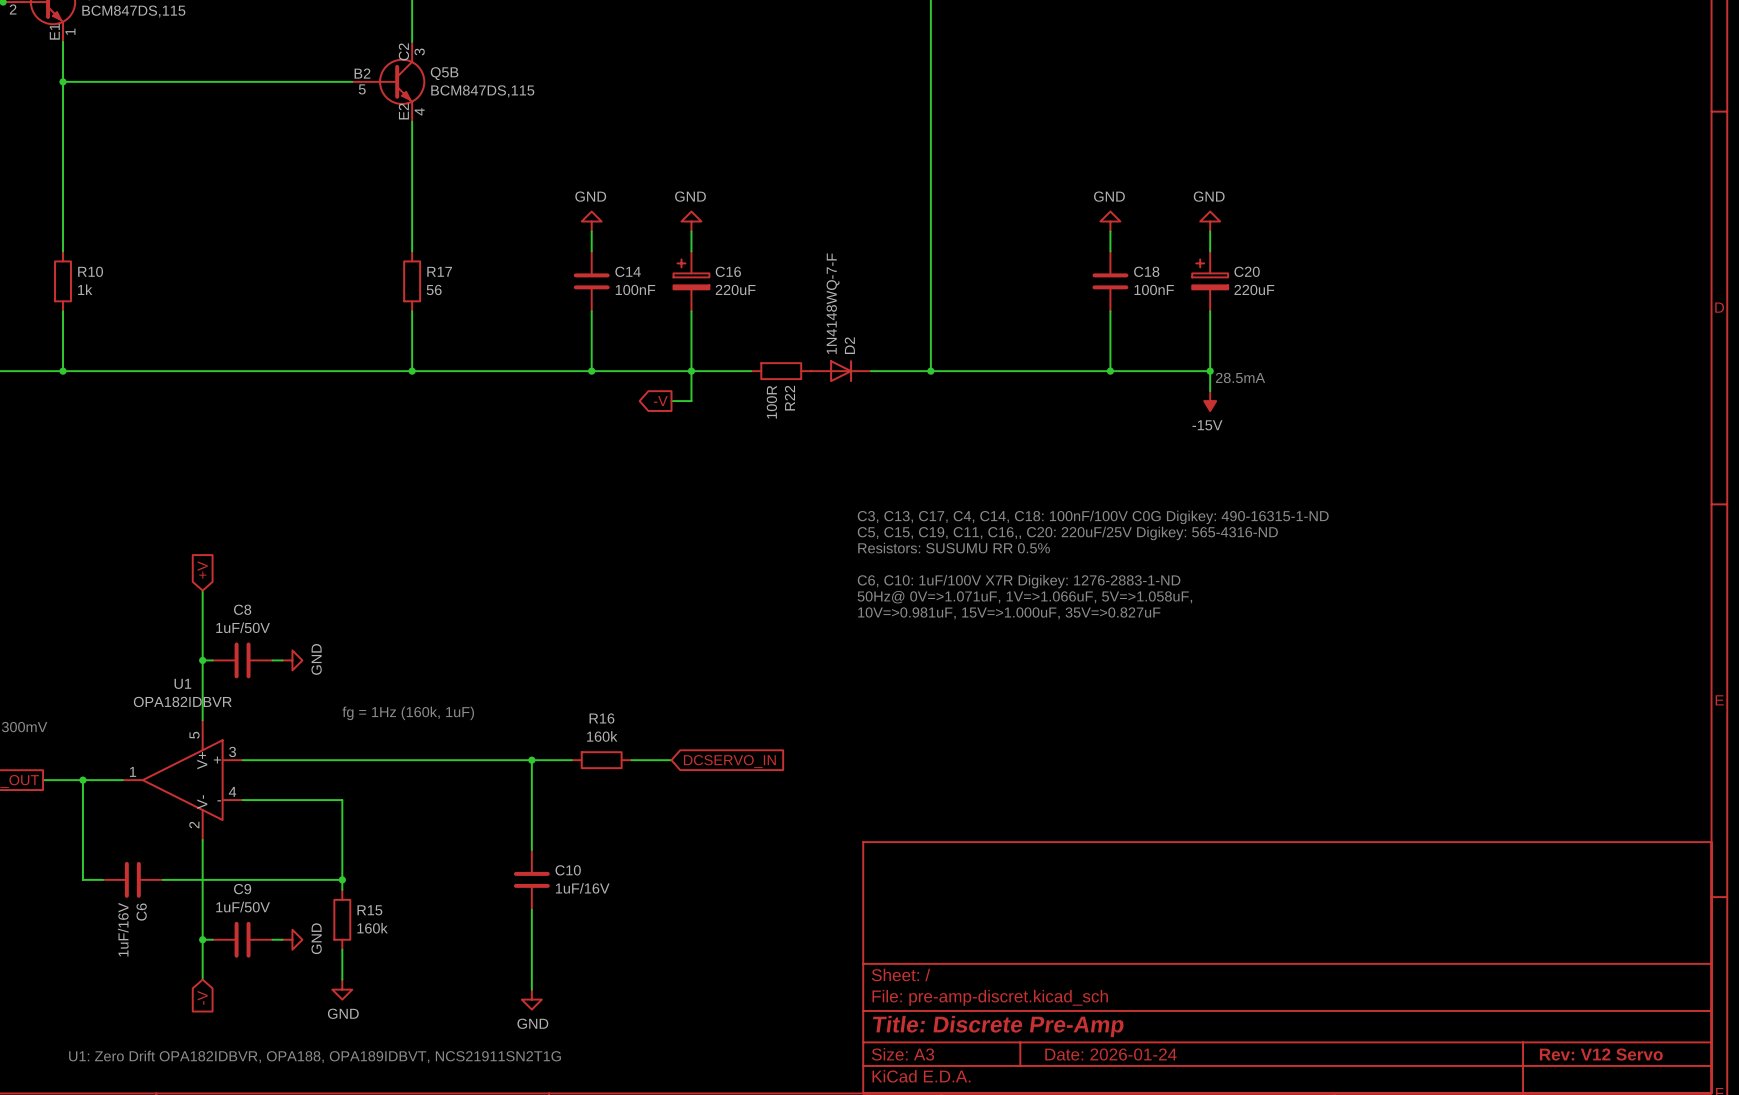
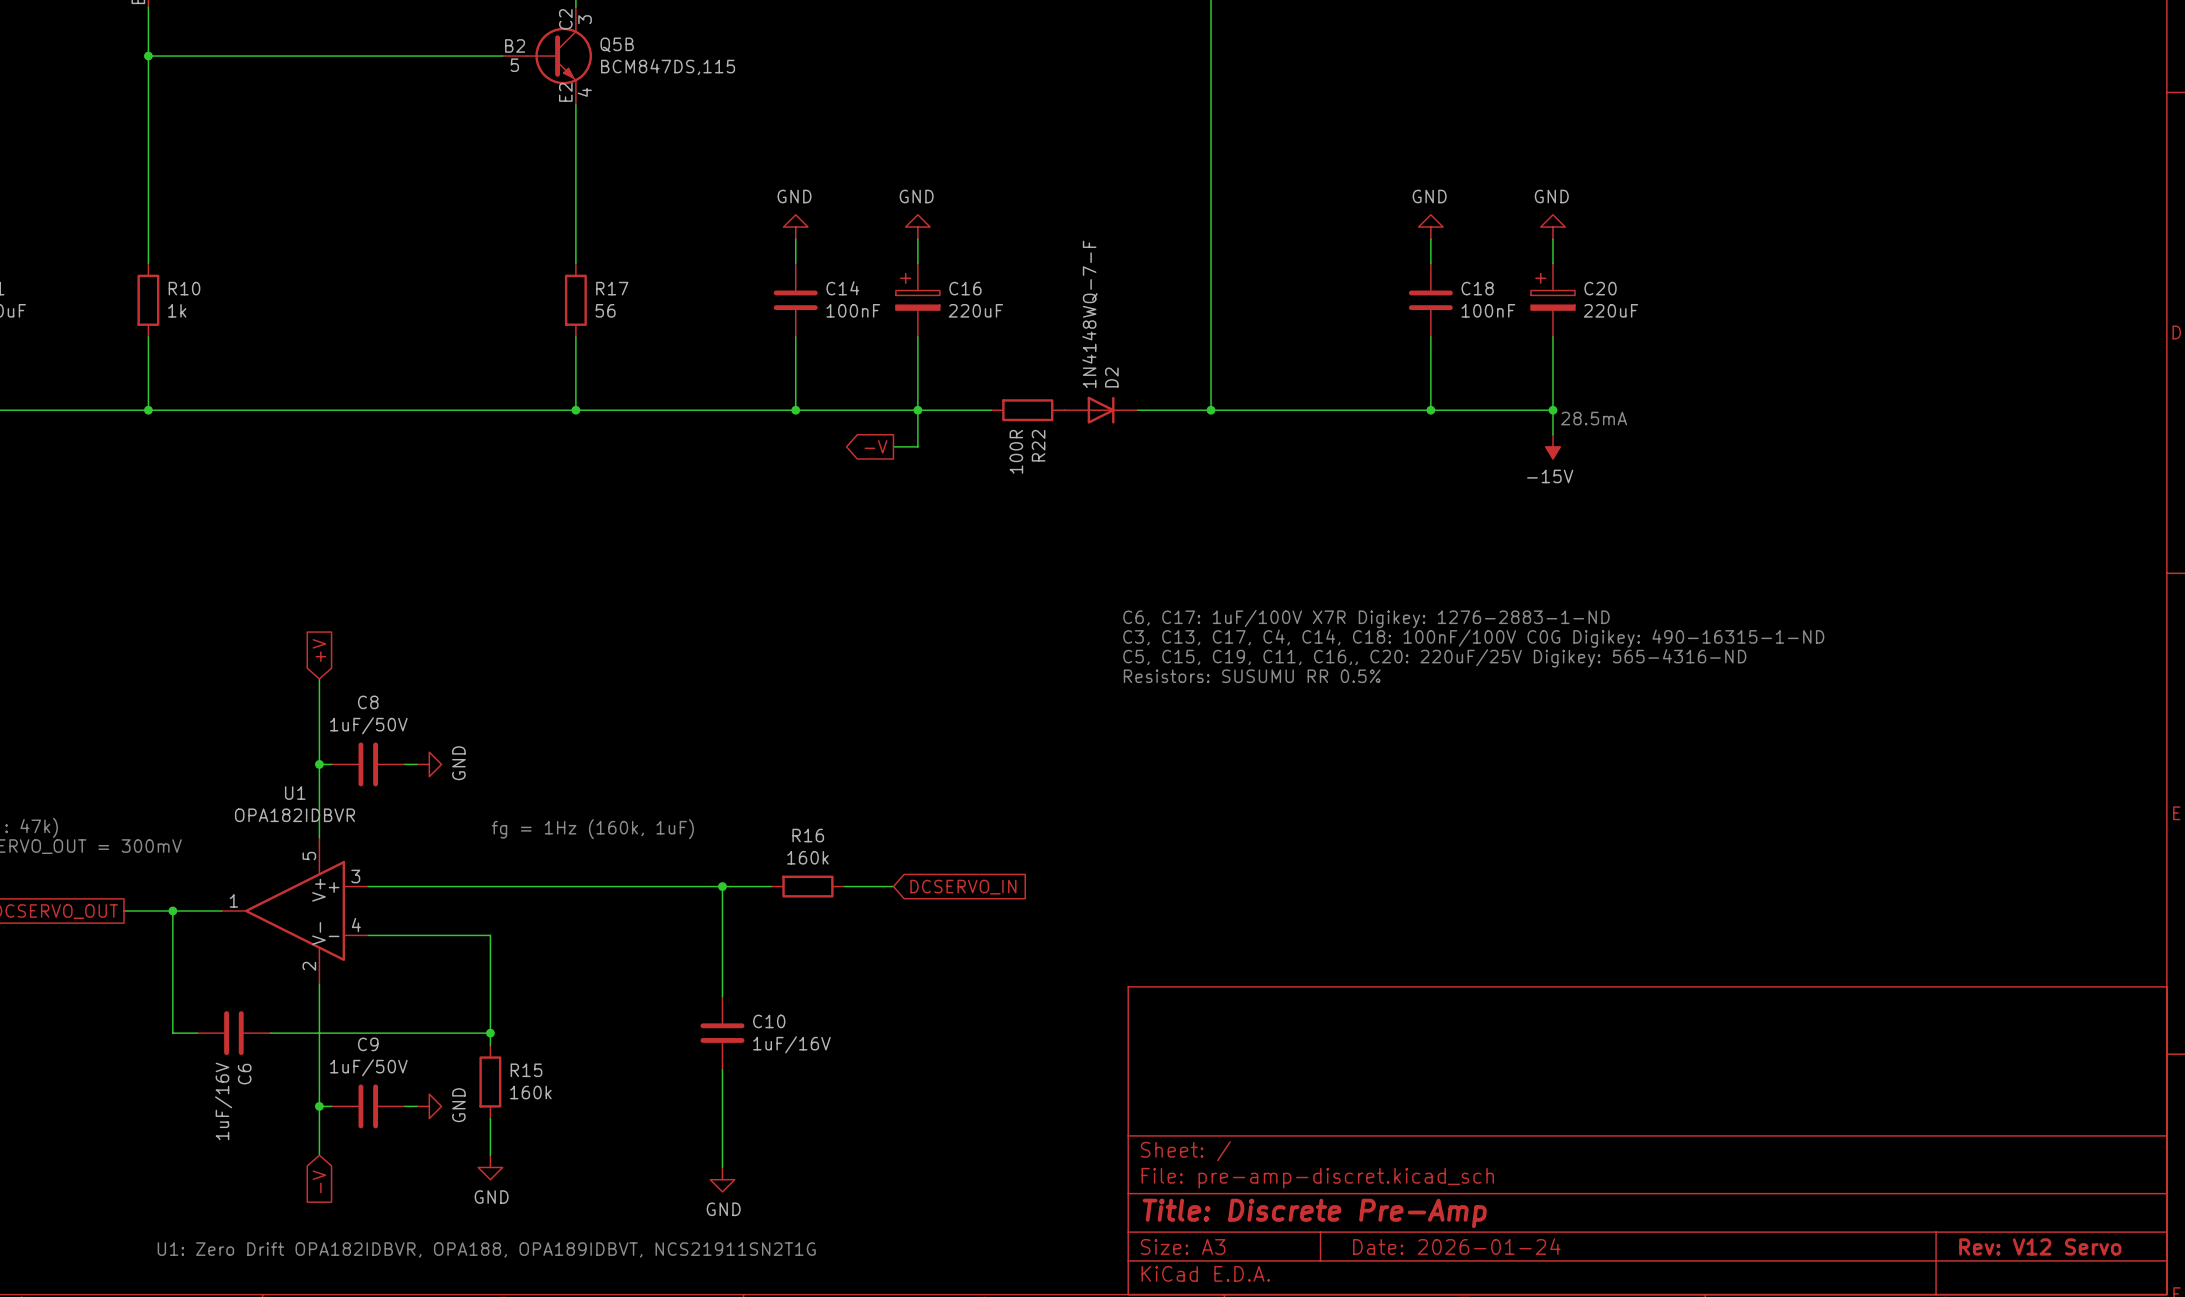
text position: C3, C13, C17, C4, C14, C18: 100nF/100V C0G Digikey: 490-16315-1-ND (1093, 517) -> C3, C13, C17, C4, C14, C18: 100nF/100V C0G Digikey: 490-16315-1-ND (1473, 638)
text position: C5, C15, C19, C11, C16,, C20: 220uF/25V Digikey: 565-4316-ND (1067, 533) -> C5, C15, C19, C11, C16,, C20: 220uF/25V Digikey: 565-4316-ND (1434, 658)
text: none -> C6, C17: 1uF/100V X7R Digikey: 1276-2883-1-ND (1366, 619)
text position: Resistors: SUSUMU RR 0.5% (954, 548) -> Resistors: SUSUMU RR 0.5% (1252, 676)
text: C6, C10: 1uF/100V X7R Digikey: 1276-2883-1-ND (1019, 581) -> none
text: 50Hz@ 0V=>1.071uF, 1V=>1.066uF, 5V=>1.058uF, (1024, 597) -> none
text: 10V=>0.981uF, 15V=>1.000uF, 35V=>0.827uF (1009, 613) -> none

